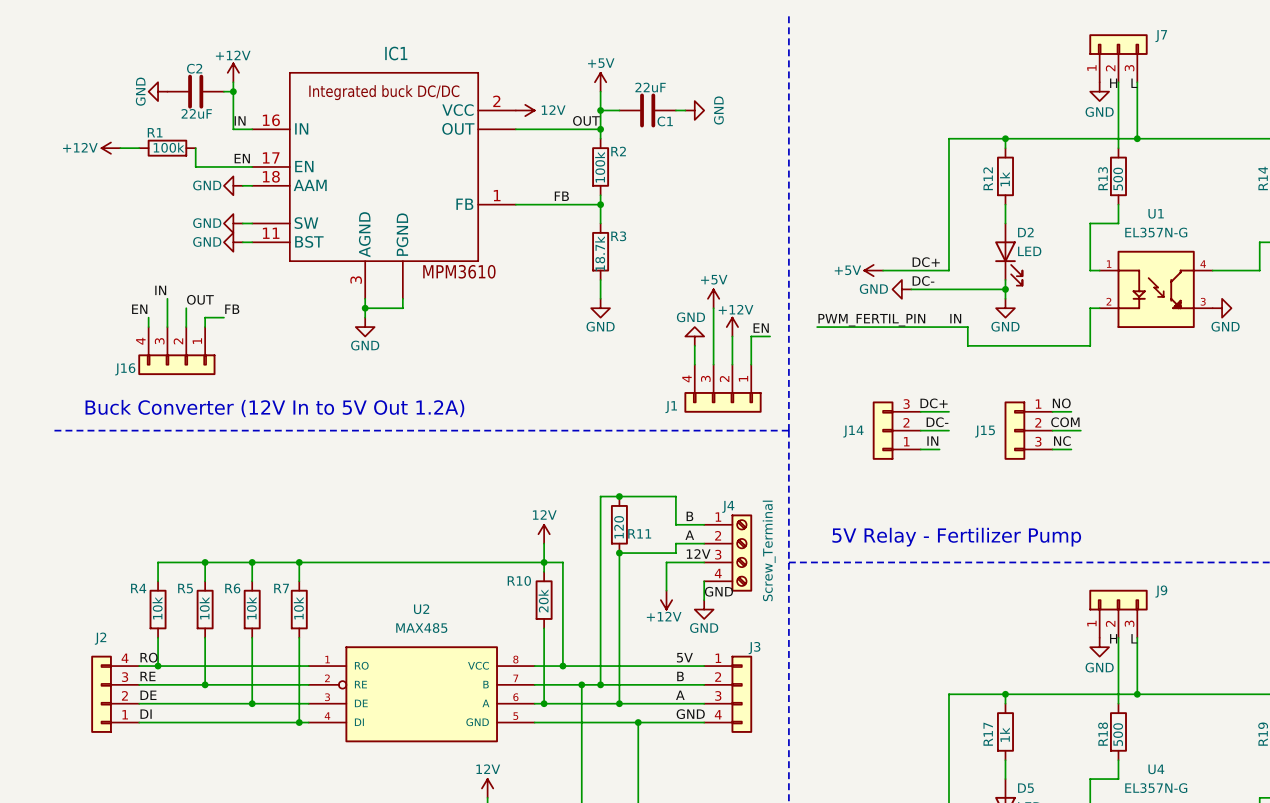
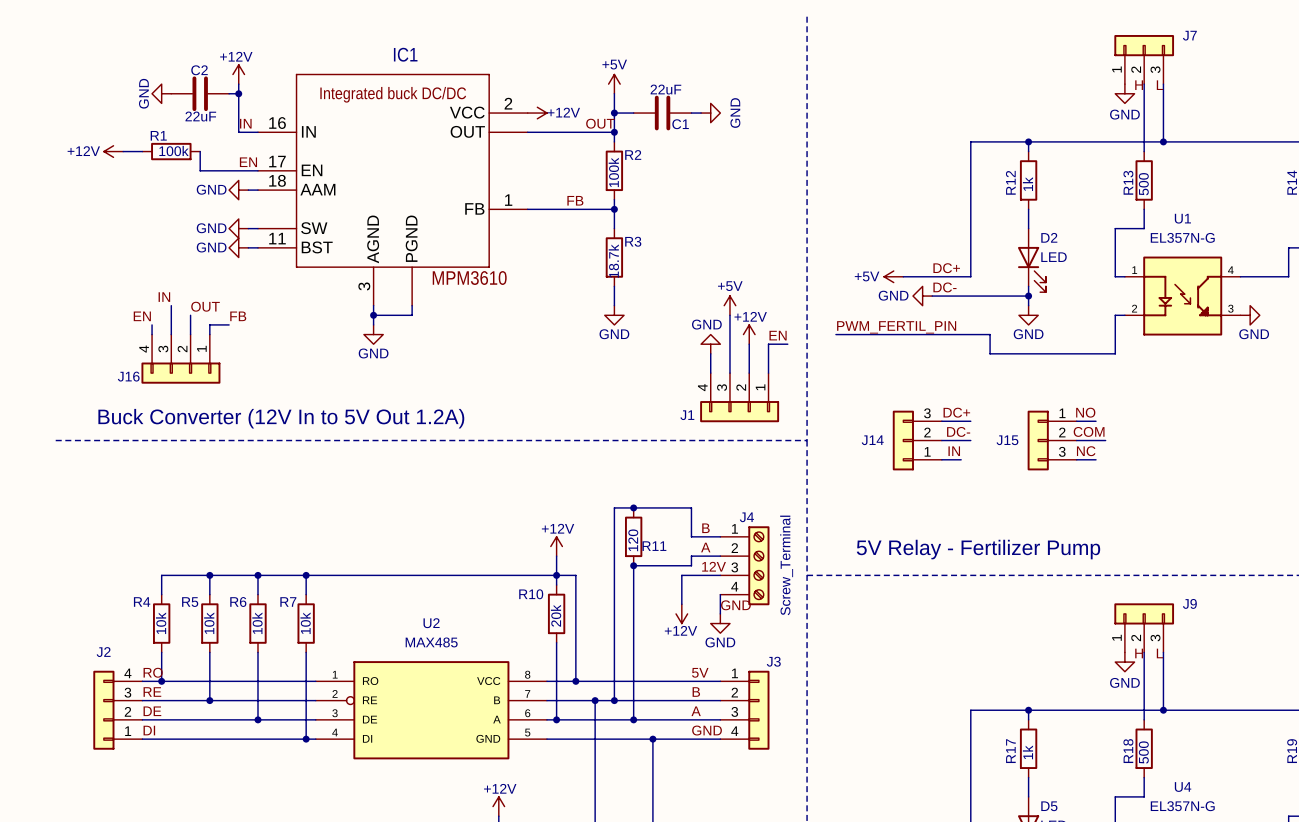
power symbol: 12V (525, 110) -> +12V (537, 113)
label: IN (955, 318) -> none
power symbol: 12V (544, 534) -> +12V (556, 546)
power symbol: 12V (487, 788) -> +12V (498, 806)

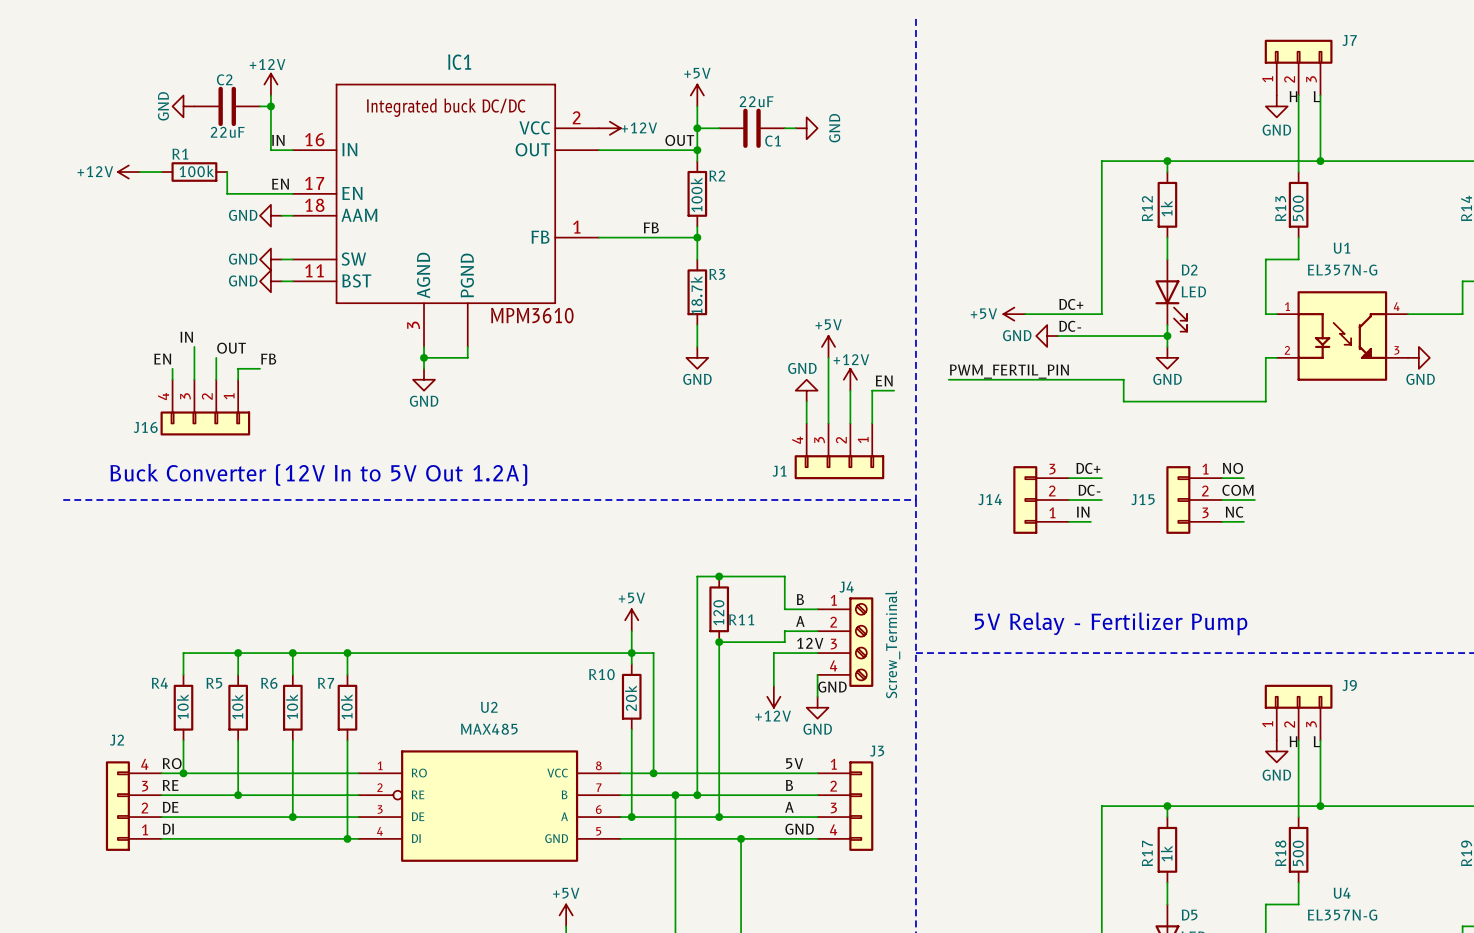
power symbol: +12V (556, 546) -> +5V (631, 620)
power symbol: +12V (498, 806) -> +5V (566, 915)

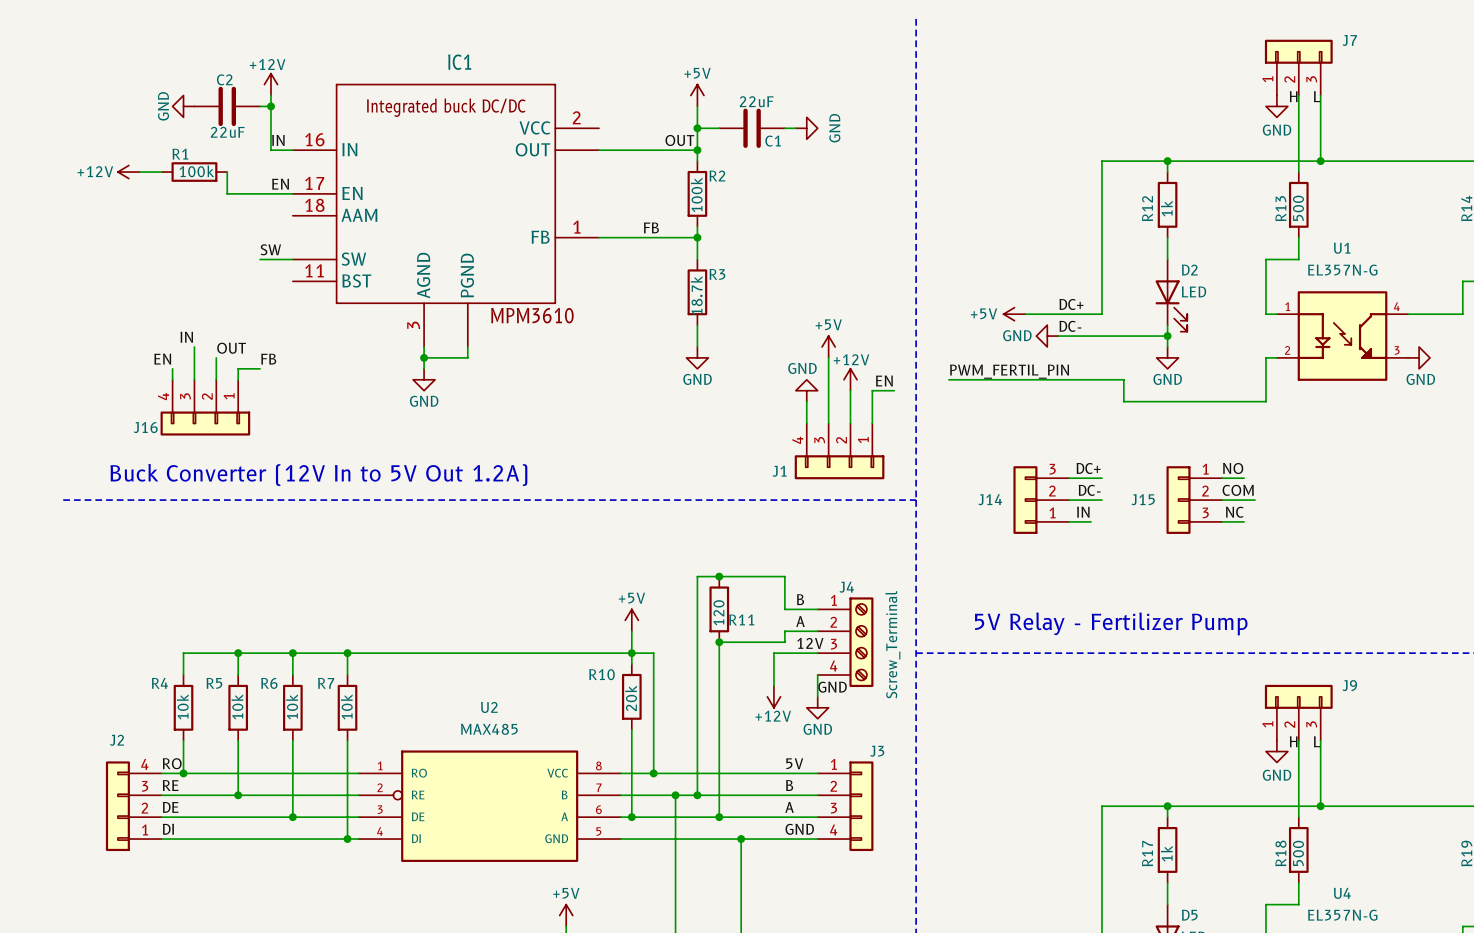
power symbol: +12V (609, 128) -> none
power symbol: GND (270, 215) -> none
wire: (281, 215) (292, 215) -> none
label: none -> SW (270, 249)
power symbol: GND (270, 259) -> none
power symbol: GND (270, 281) -> none
wire: (281, 281) (292, 281) -> none

